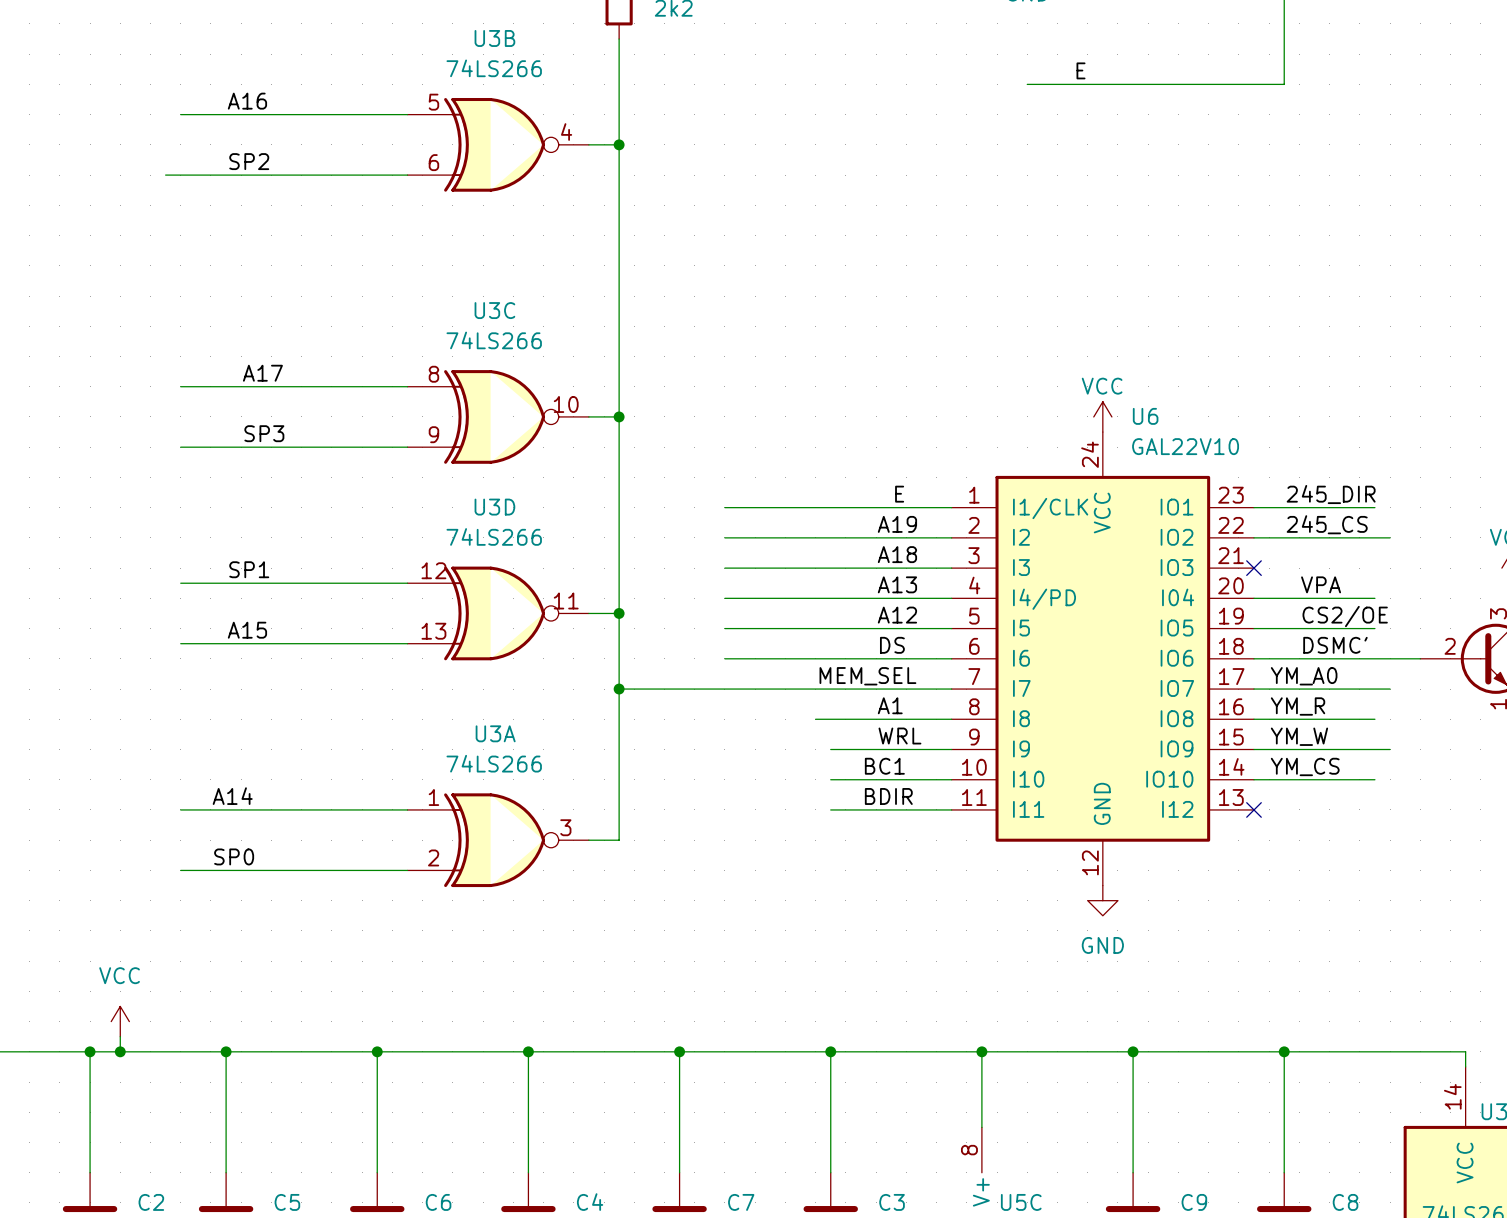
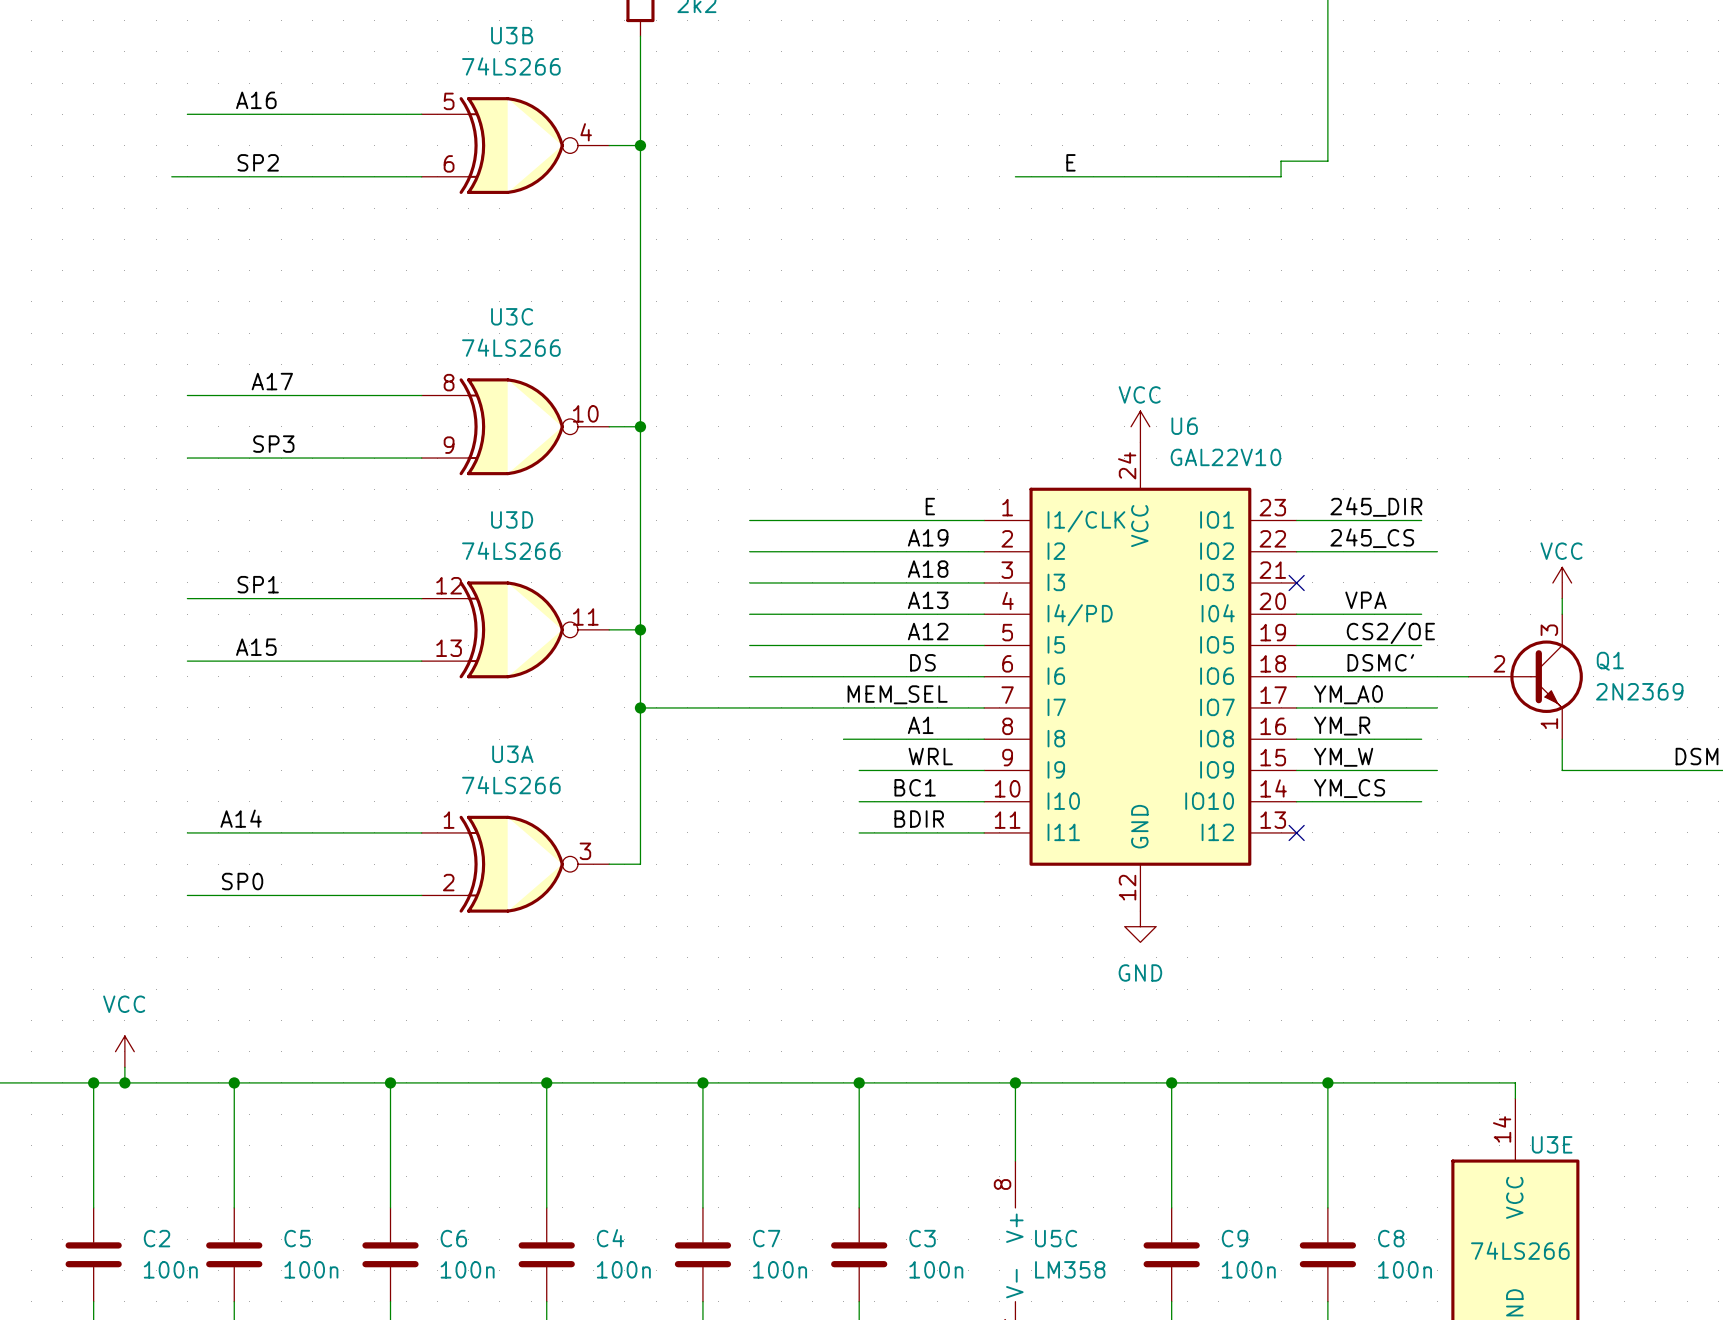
label position: E (1081, 70) -> E (1070, 162)
wire: (1027, 84) (1284, 84) -> (1015, 176) (1281, 176) (1281, 161) (1327, 161) (1327, 83)

